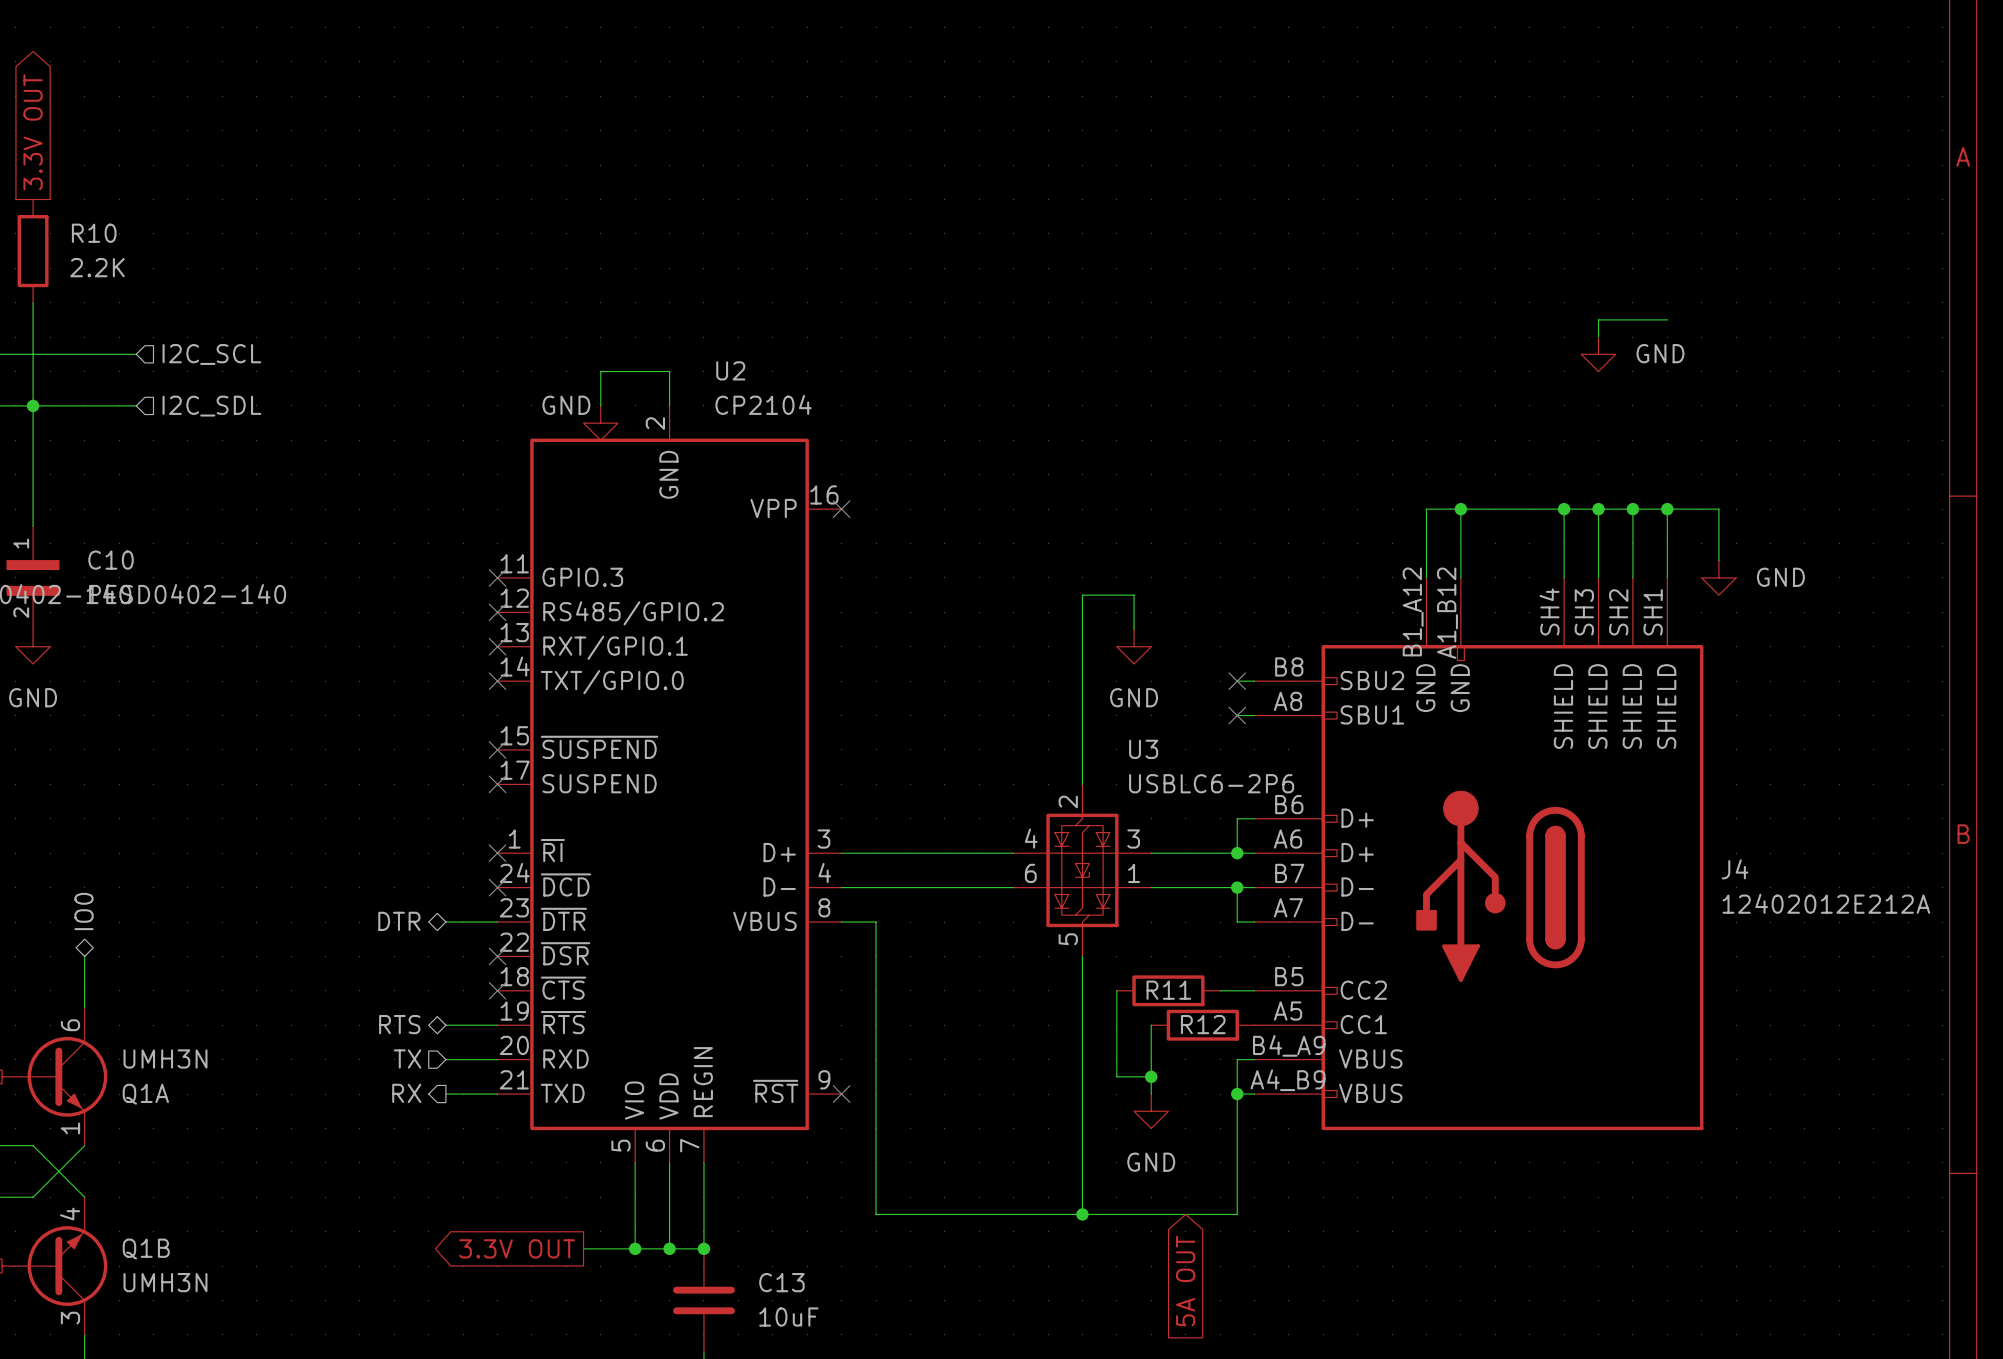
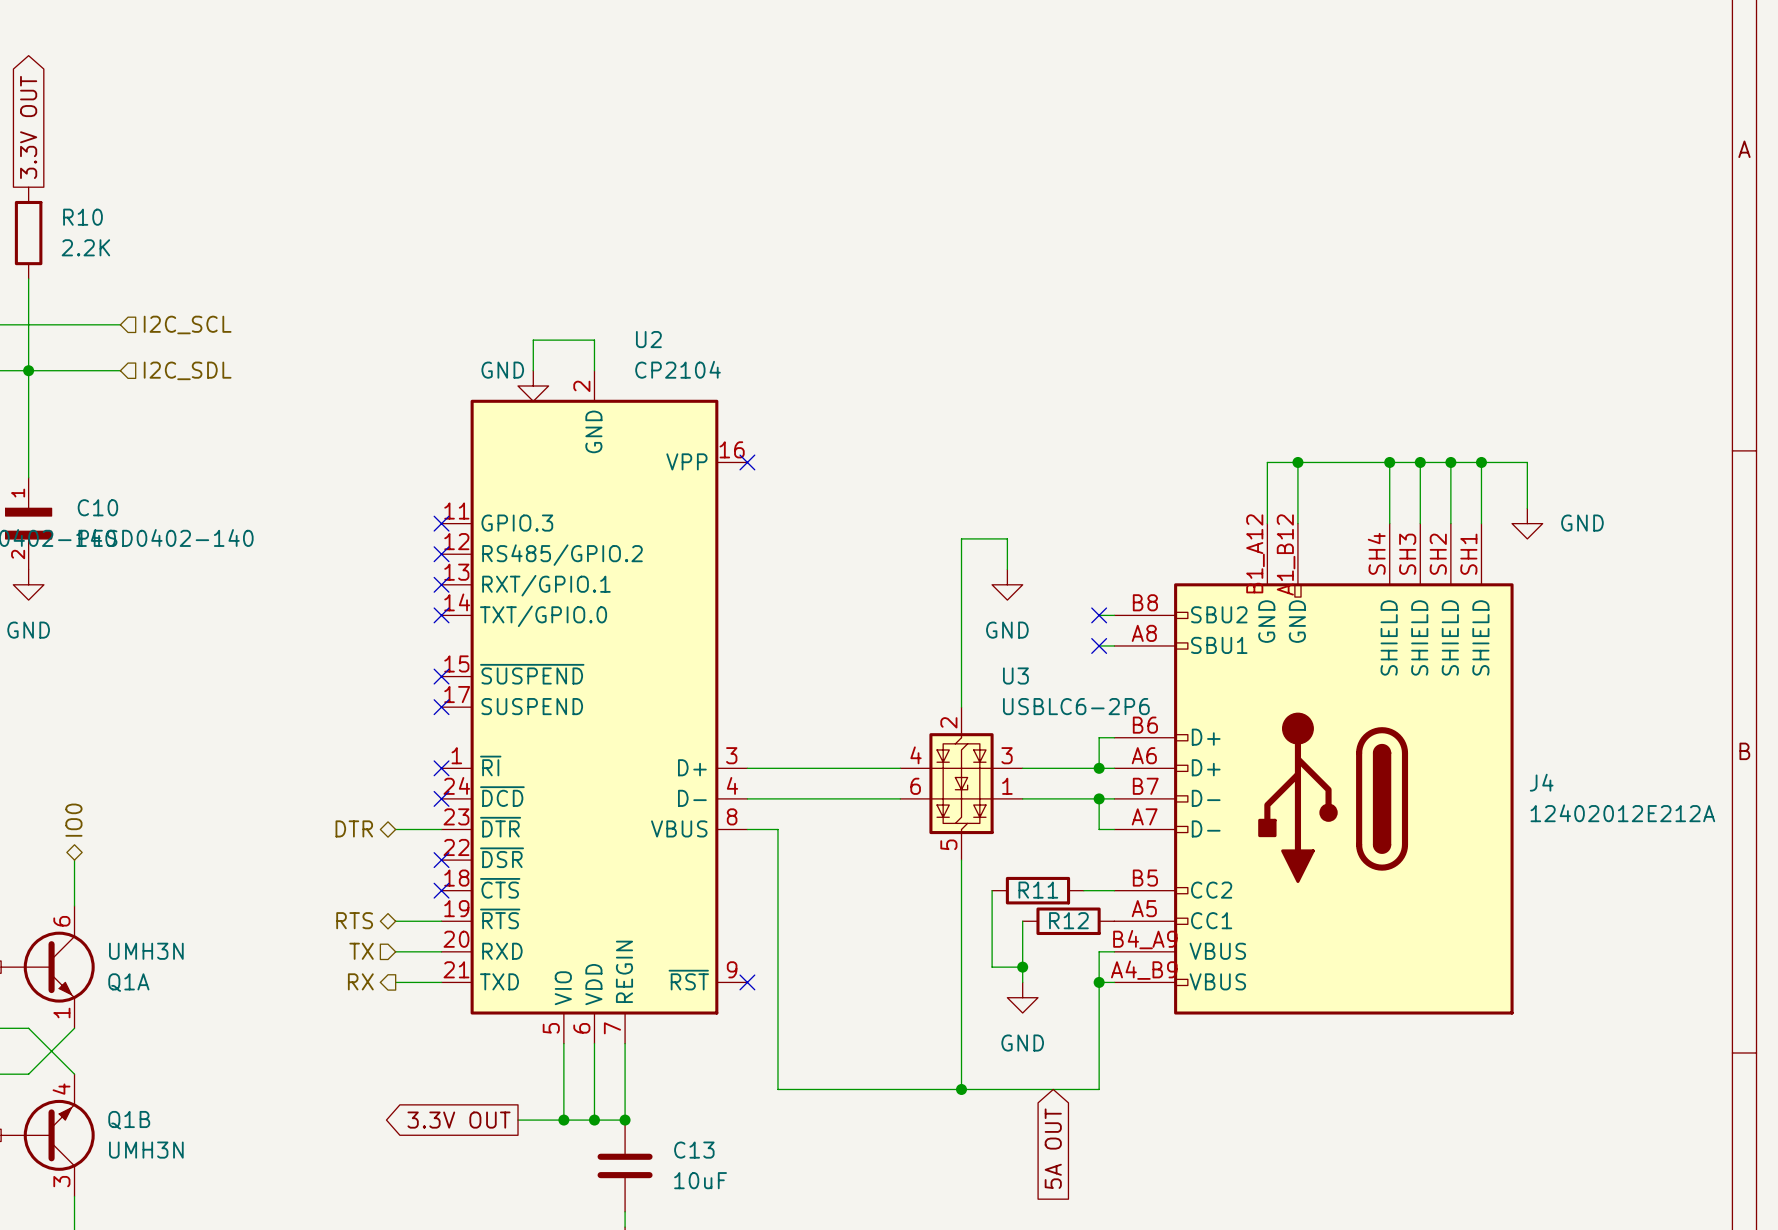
wire: (1667, 319) (1598, 319) (1598, 337) -> none
power symbol: GND (1598, 354) -> none

